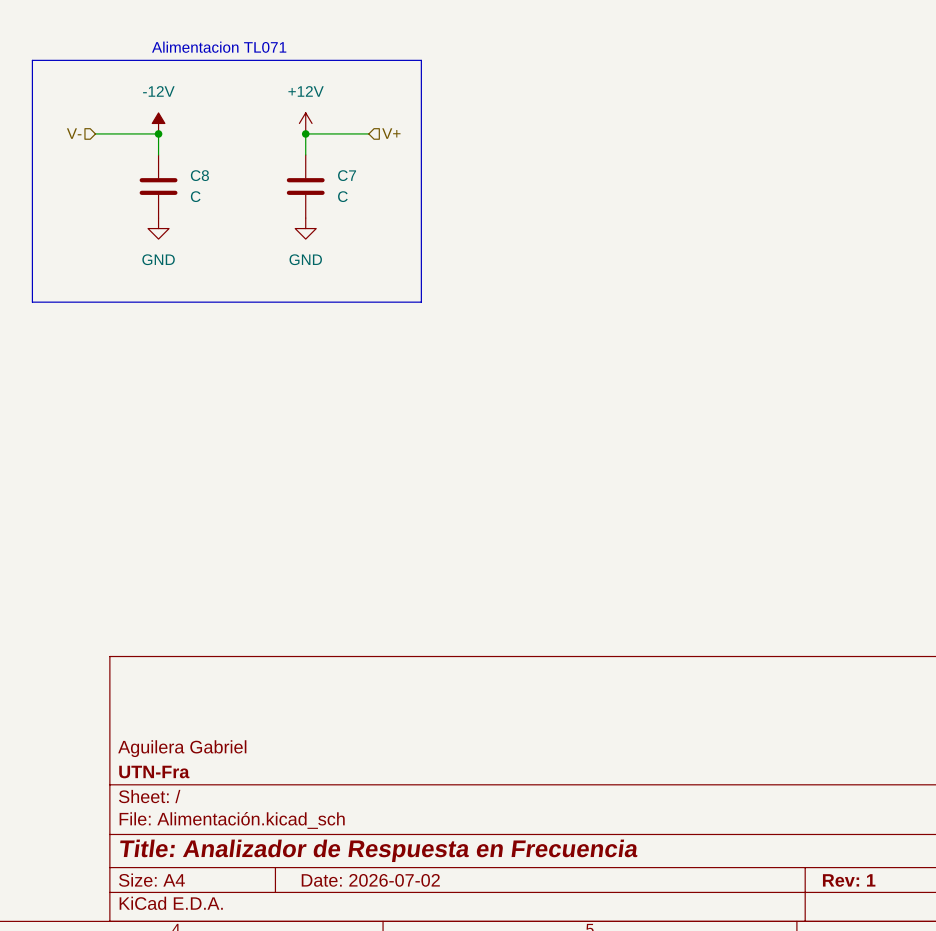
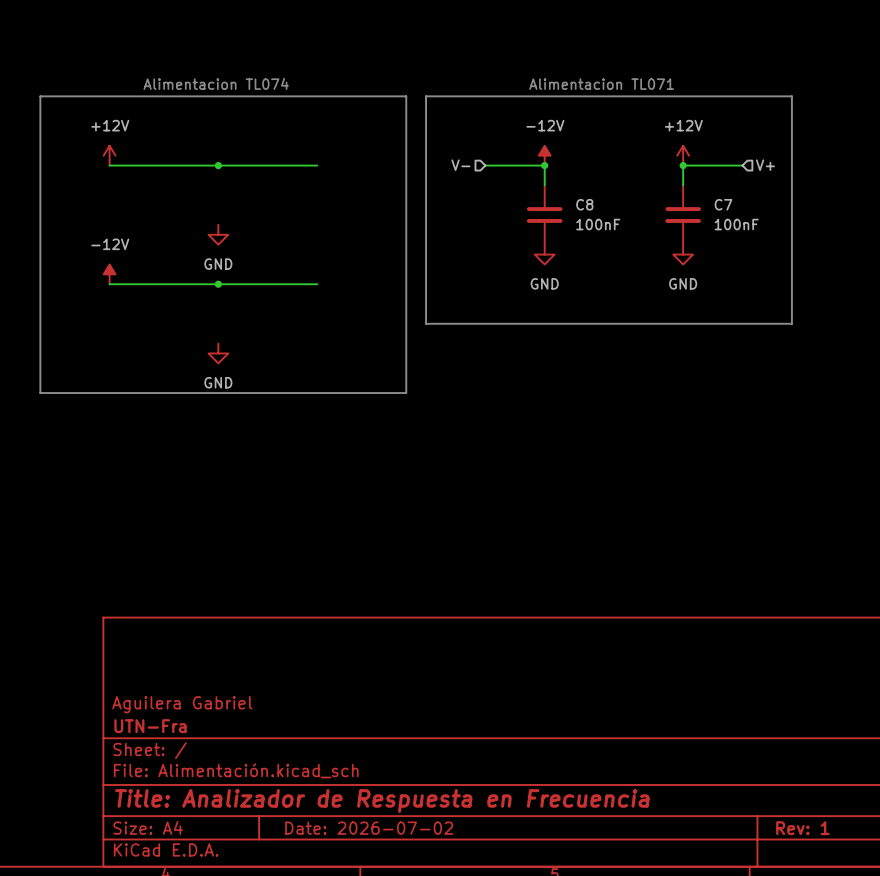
text: Alimentacion TL071 (219, 47) -> none
line: (32, 60) (421, 60) (421, 302) (32, 302) (32, 60) -> (40, 96) (40, 393) (406, 393) (406, 96) (40, 96)
text: none -> Alimentacion TL074 (216, 83)
text: none -> Alimentacion TL071 (601, 84)
line: none -> (426, 96) (791, 96) (791, 323) (426, 323) (426, 96)
power symbol position: -12V (158, 123) -> -12V (109, 274)
power symbol position: +12V (305, 123) -> +12V (109, 155)
hierarchical label: V- (74, 133) -> none
wire: (95, 133) (158, 133) (158, 154) -> none
junction: (158, 133) -> none
junction: (305, 133) -> none
wire: (368, 133) (305, 133) (305, 154) -> none
hierarchical label: V+ (391, 133) -> none
power symbol: none -> -12V (544, 155)
power symbol: none -> +12V (683, 155)
hierarchical label: none -> V- (460, 165)
hierarchical label: none -> V+ (765, 165)
wire: none -> (109, 165) (317, 165)
junction: none -> (218, 165)
wire: none -> (485, 165) (544, 165) (544, 185)
junction: none -> (544, 165)
junction: none -> (683, 165)
wire: none -> (742, 165) (683, 165) (683, 185)
C8 position: (158, 186) -> (544, 215)
C7 position: (305, 186) -> (683, 215)
C8 value: C (195, 196) -> 100nF (598, 224)
C7 value: C (342, 196) -> 100nF (736, 224)
power symbol: GND (158, 228) -> none
power symbol: GND (305, 228) -> none
power symbol: none -> GND (218, 234)
power symbol: none -> GND (544, 254)
power symbol: none -> GND (683, 254)
junction: none -> (218, 284)
power symbol: none -> GND (218, 353)

